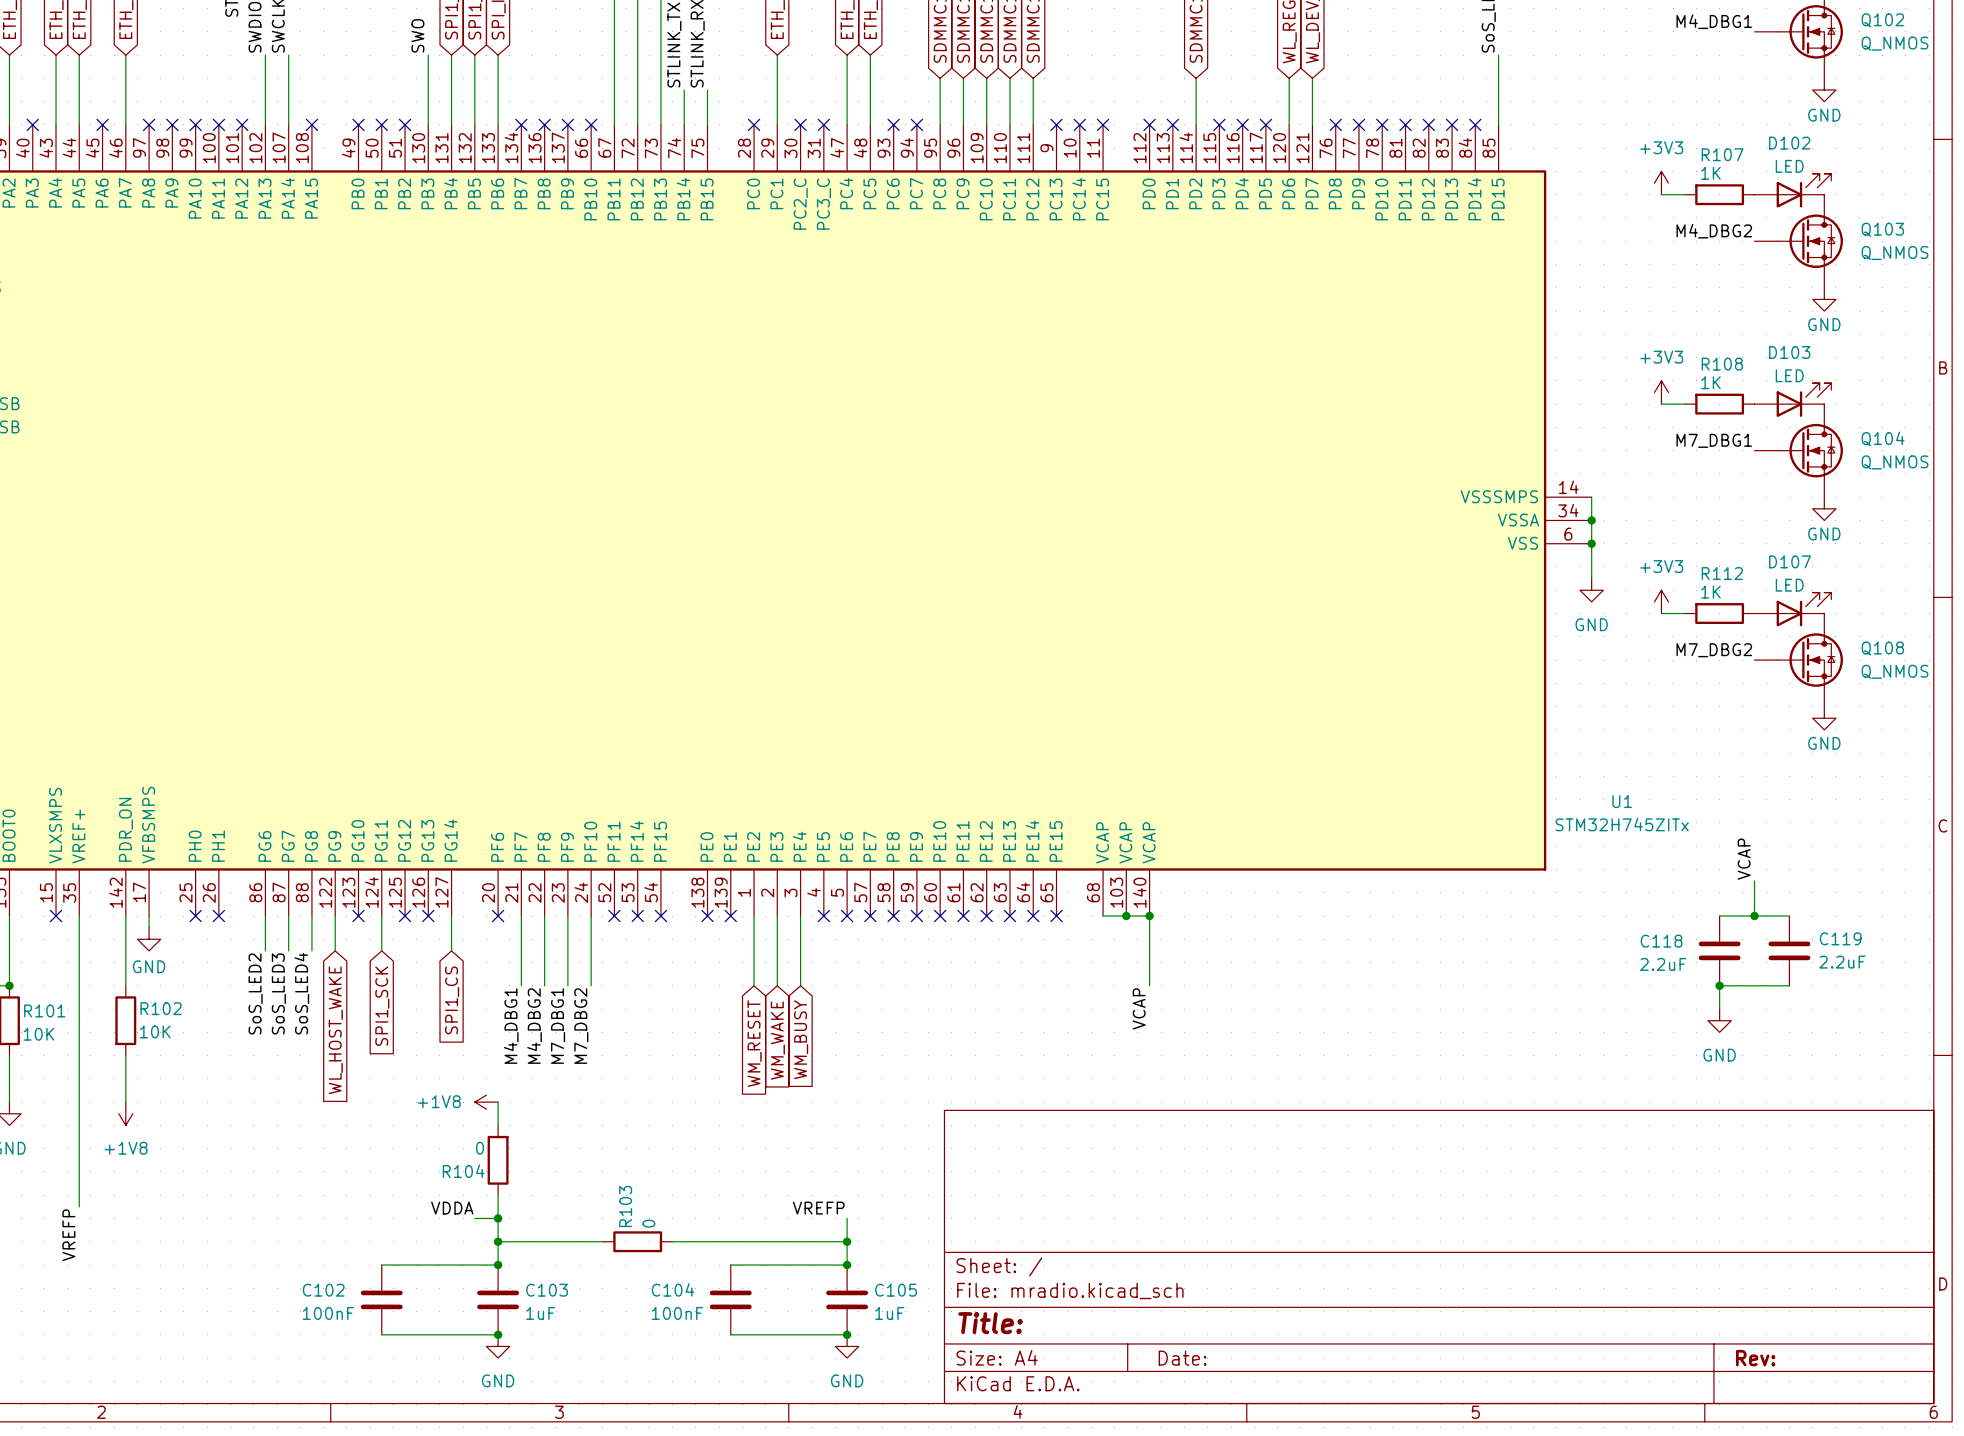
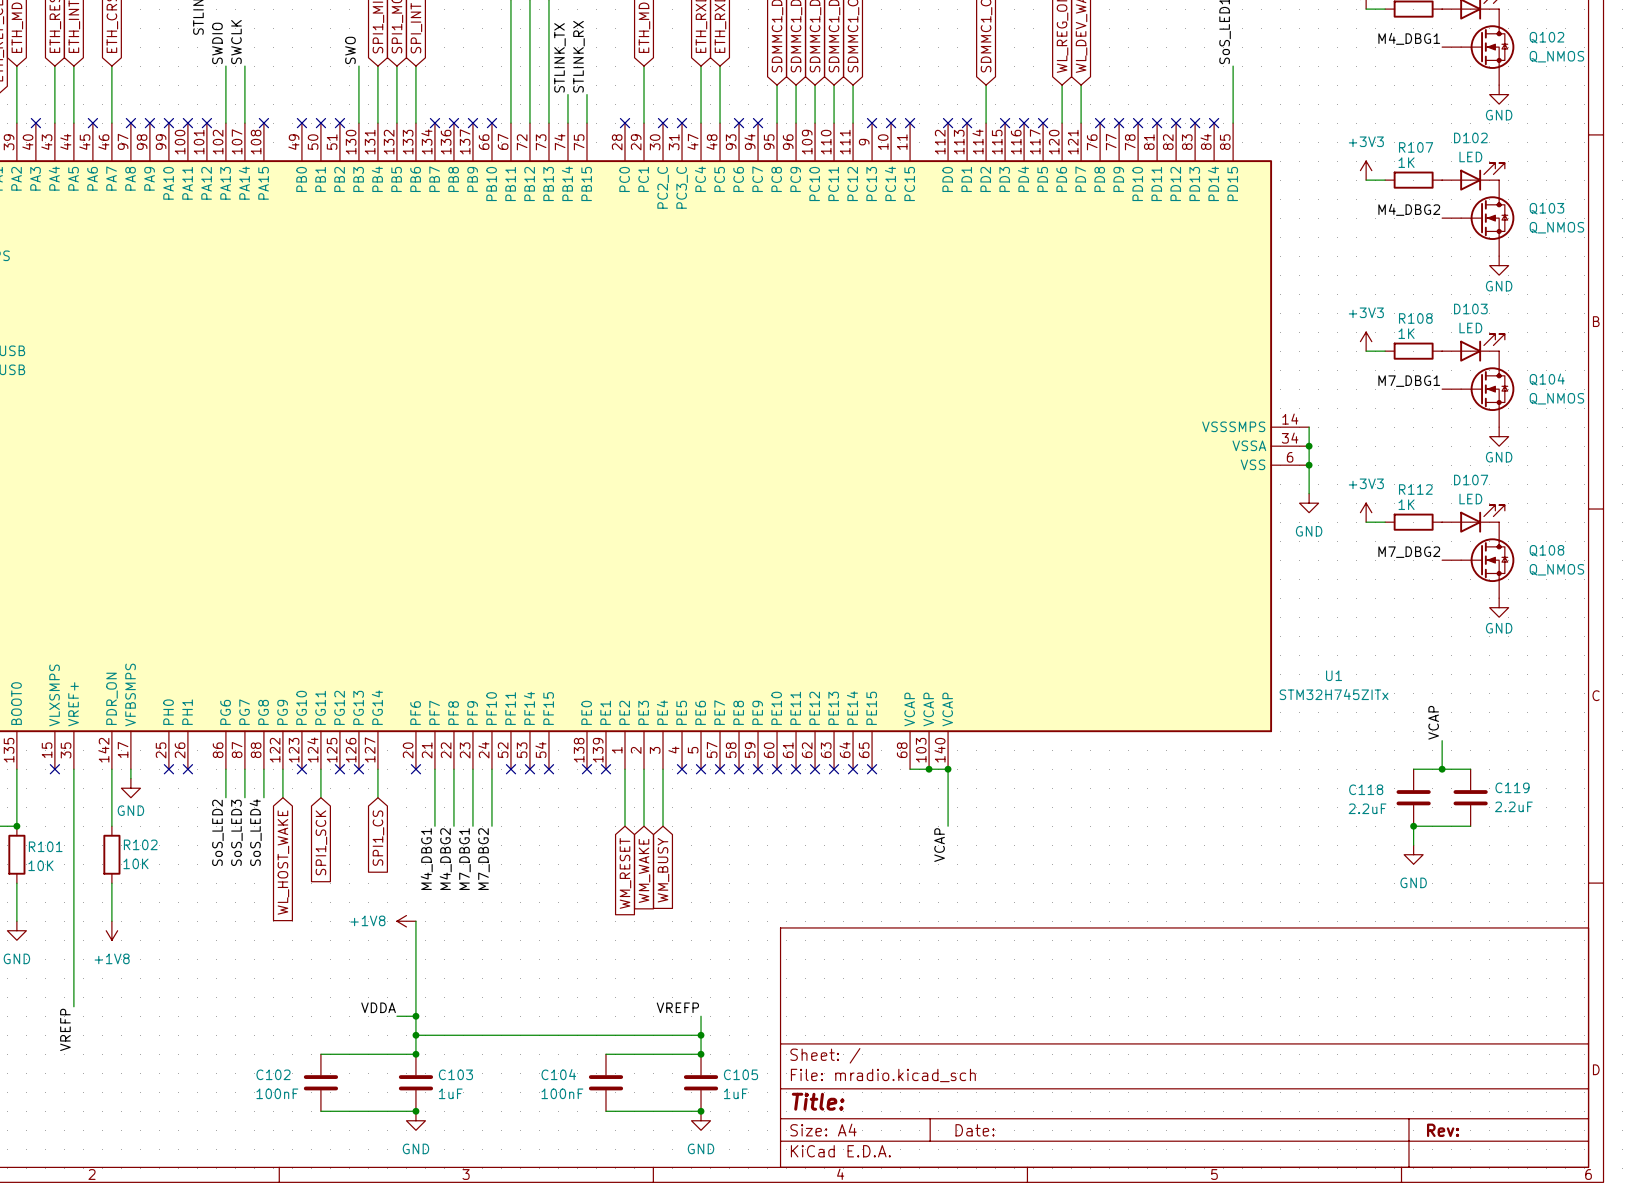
wire: none -> (415, 940) (415, 997)
R104: 0 (498, 1160) -> none
wire: none -> (501, 1035) (558, 1035)
R103: 0 (637, 1241) -> none

